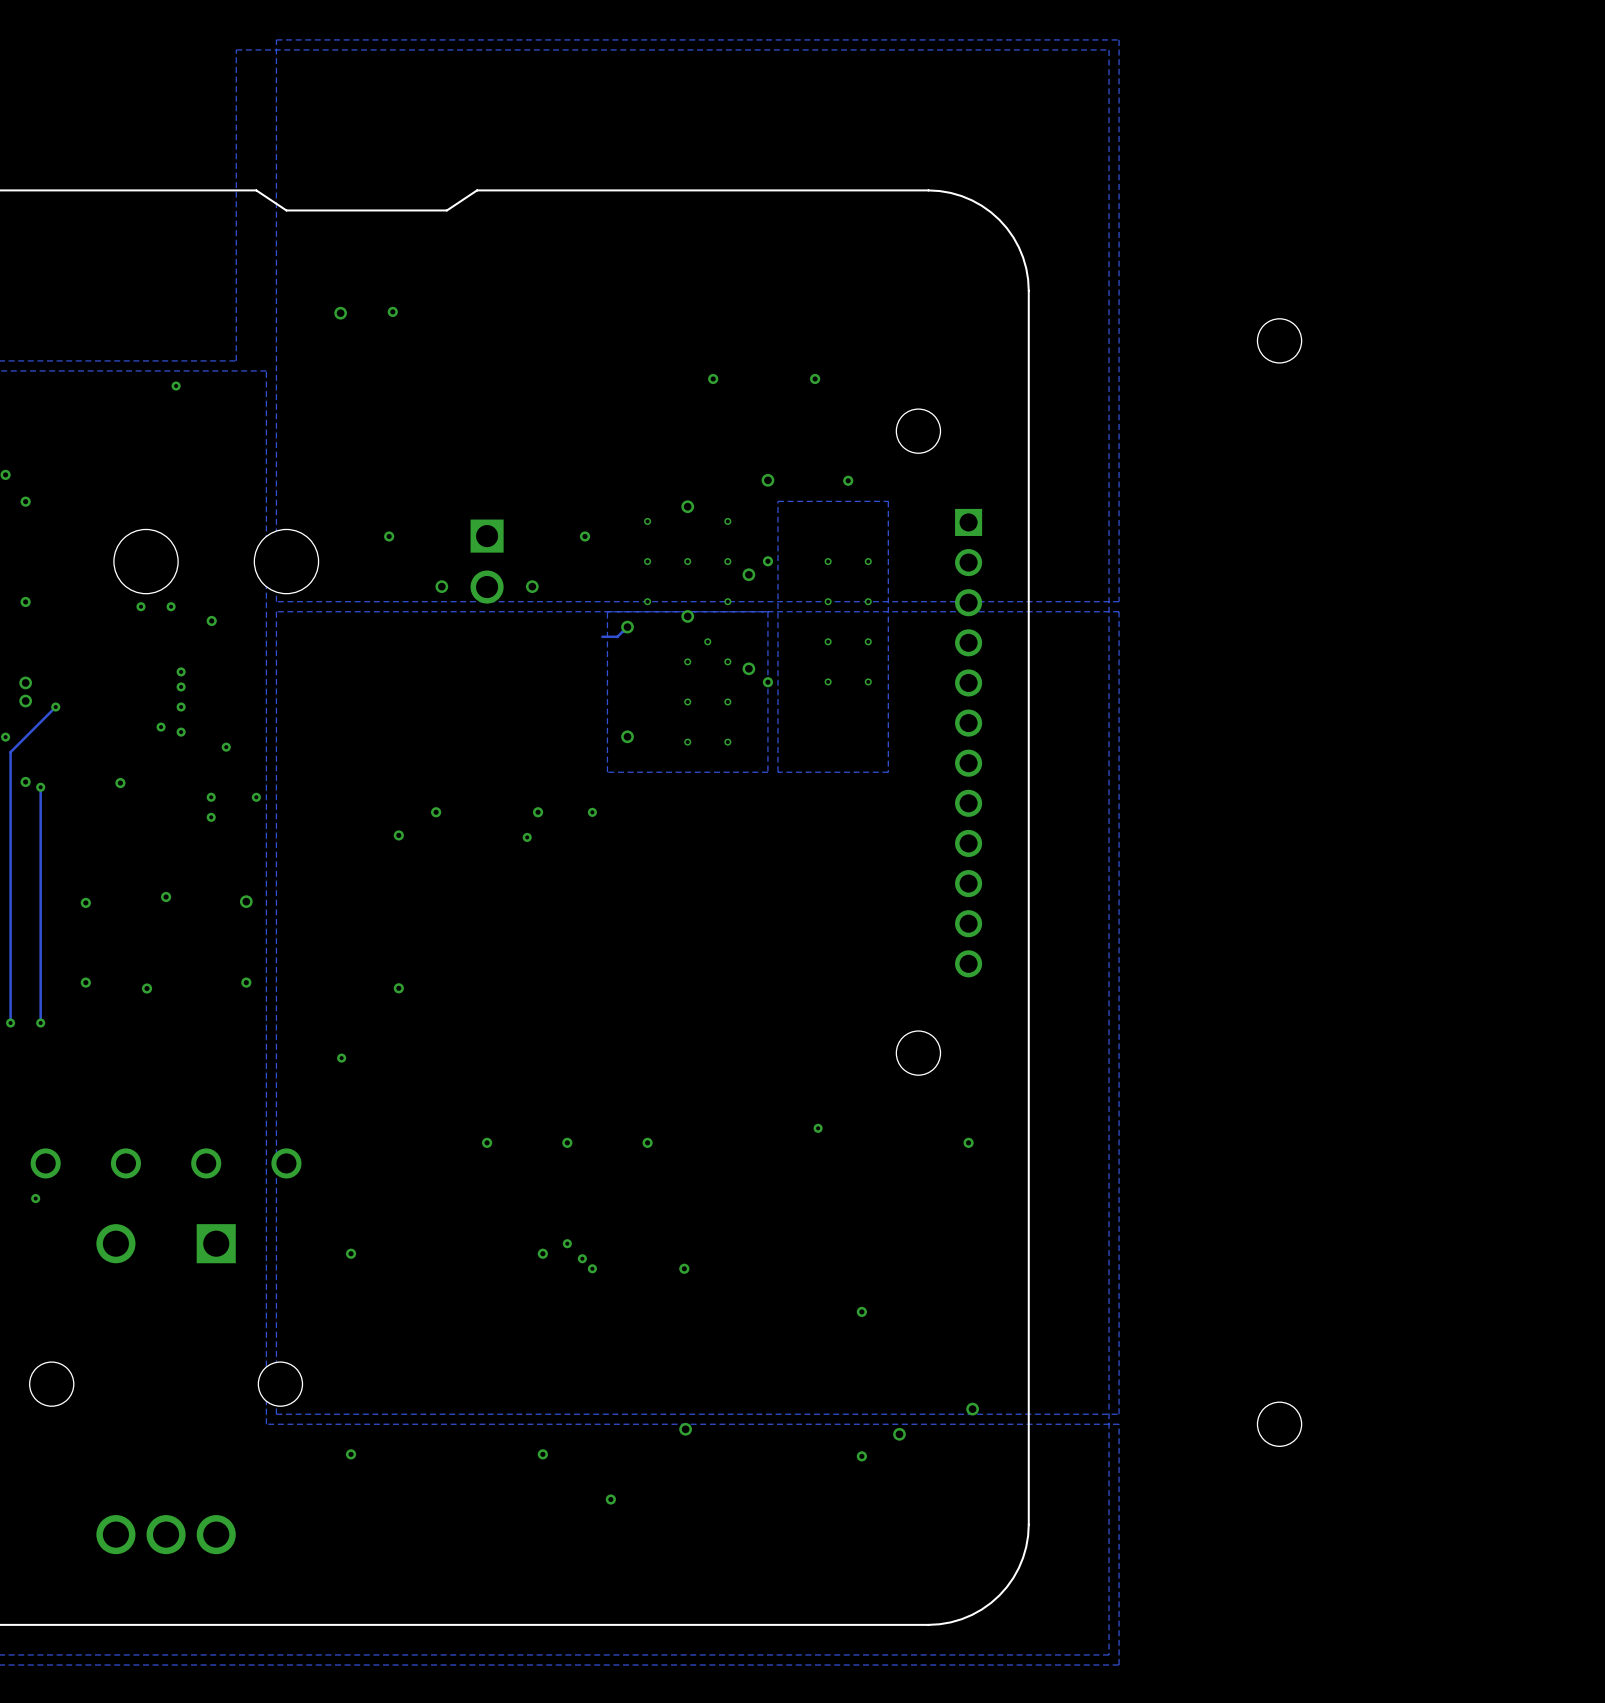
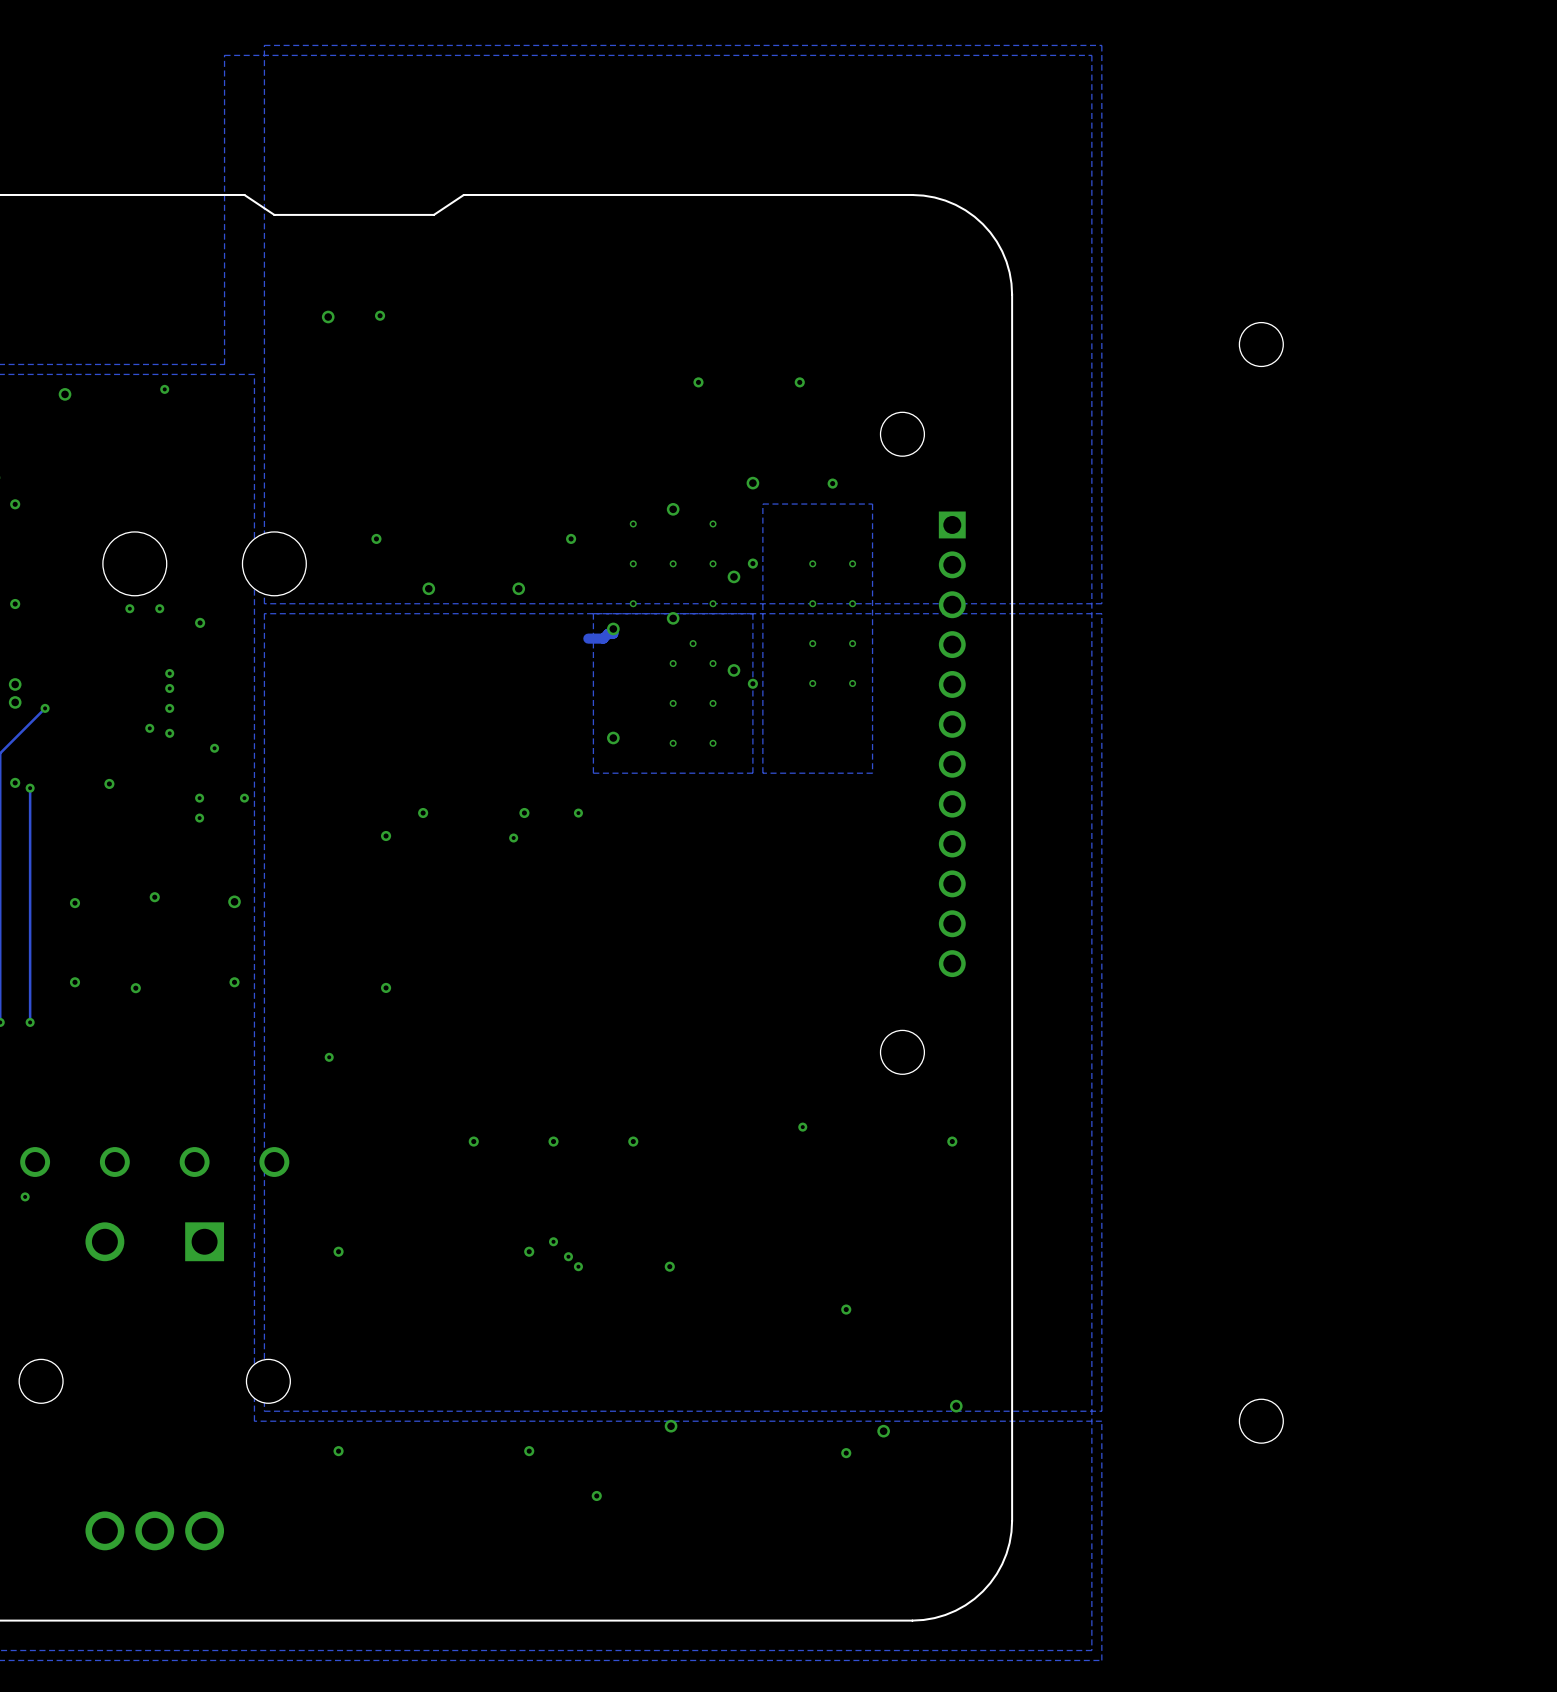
via: none -> (65, 394)
part: (487, 561) -> none
track width: thin (627, 627) (627, 631) (622, 631) (617, 636) (602, 636) -> thick (613, 628) (613, 633) (608, 633) (603, 638) (588, 638)

